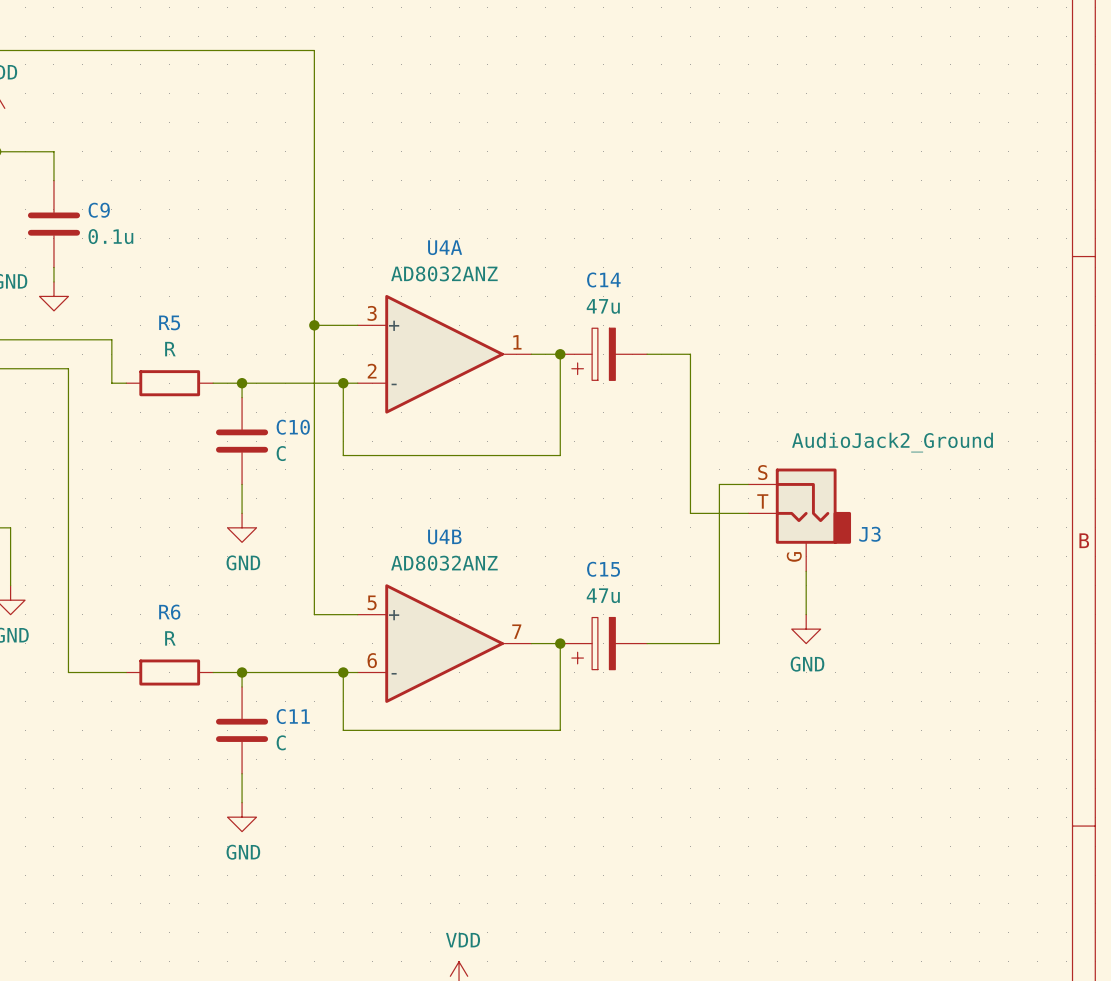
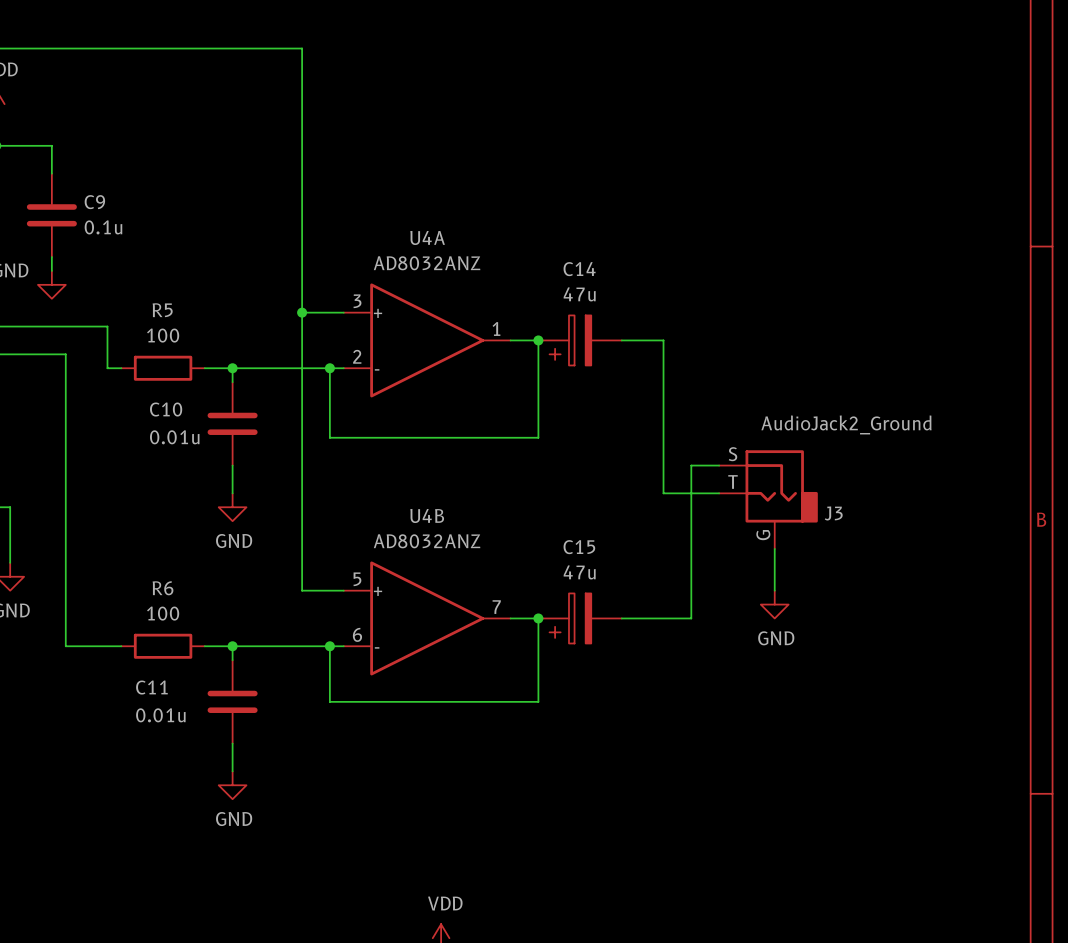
R5 value: R (170, 349) -> 100 (163, 335)
C10 name position: C10 (293, 427) -> C10 (166, 409)
C10 value: C (281, 453) -> 0.01u (174, 437)
R6 value: R (170, 638) -> 100 (163, 613)
C11 name position: C11 (293, 716) -> C11 (151, 687)
C11 value: C (281, 742) -> 0.01u (160, 715)

